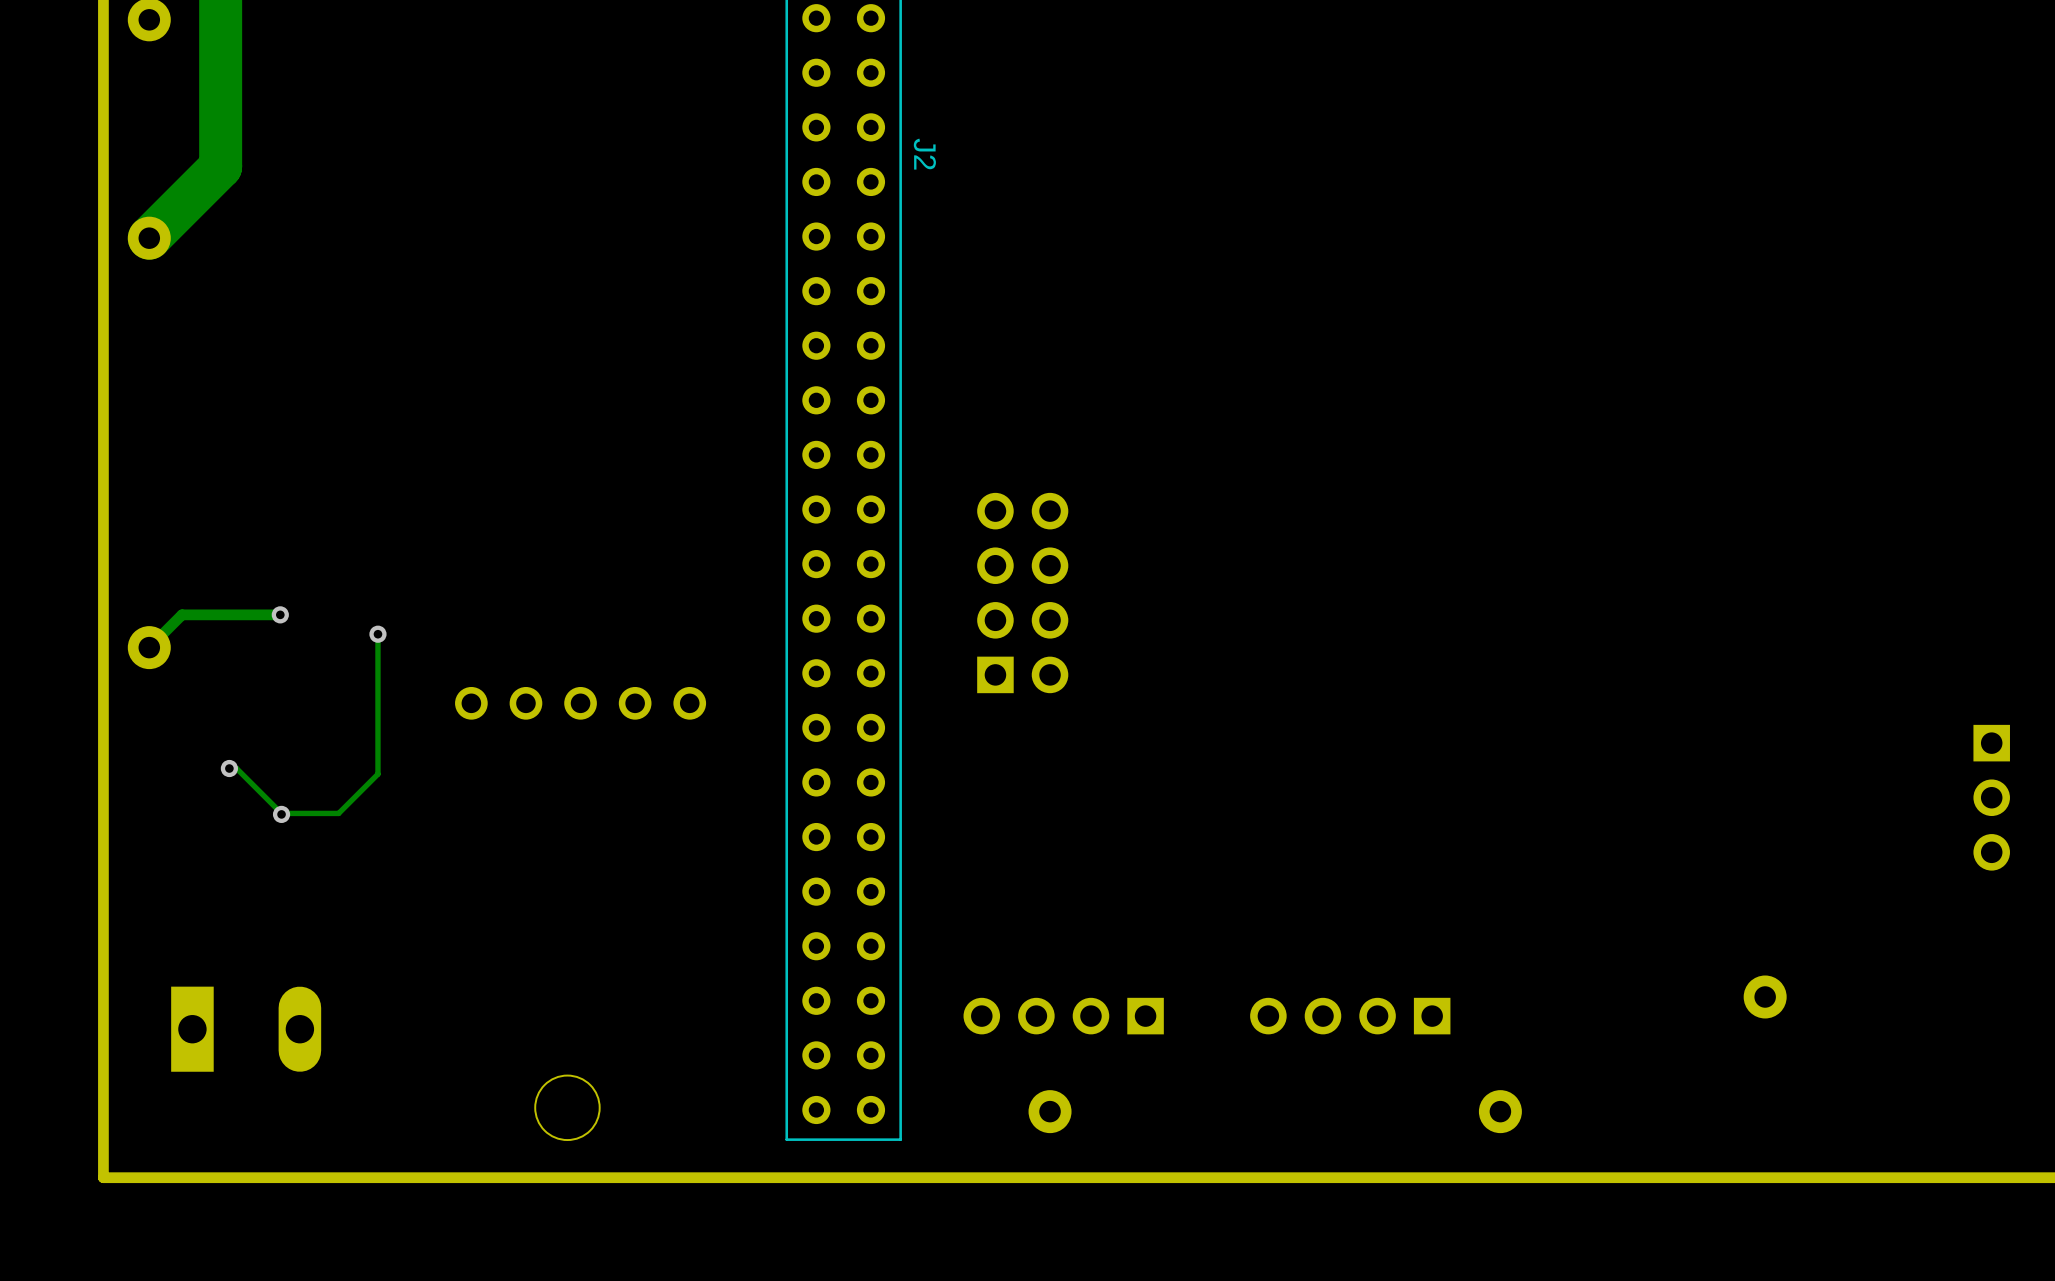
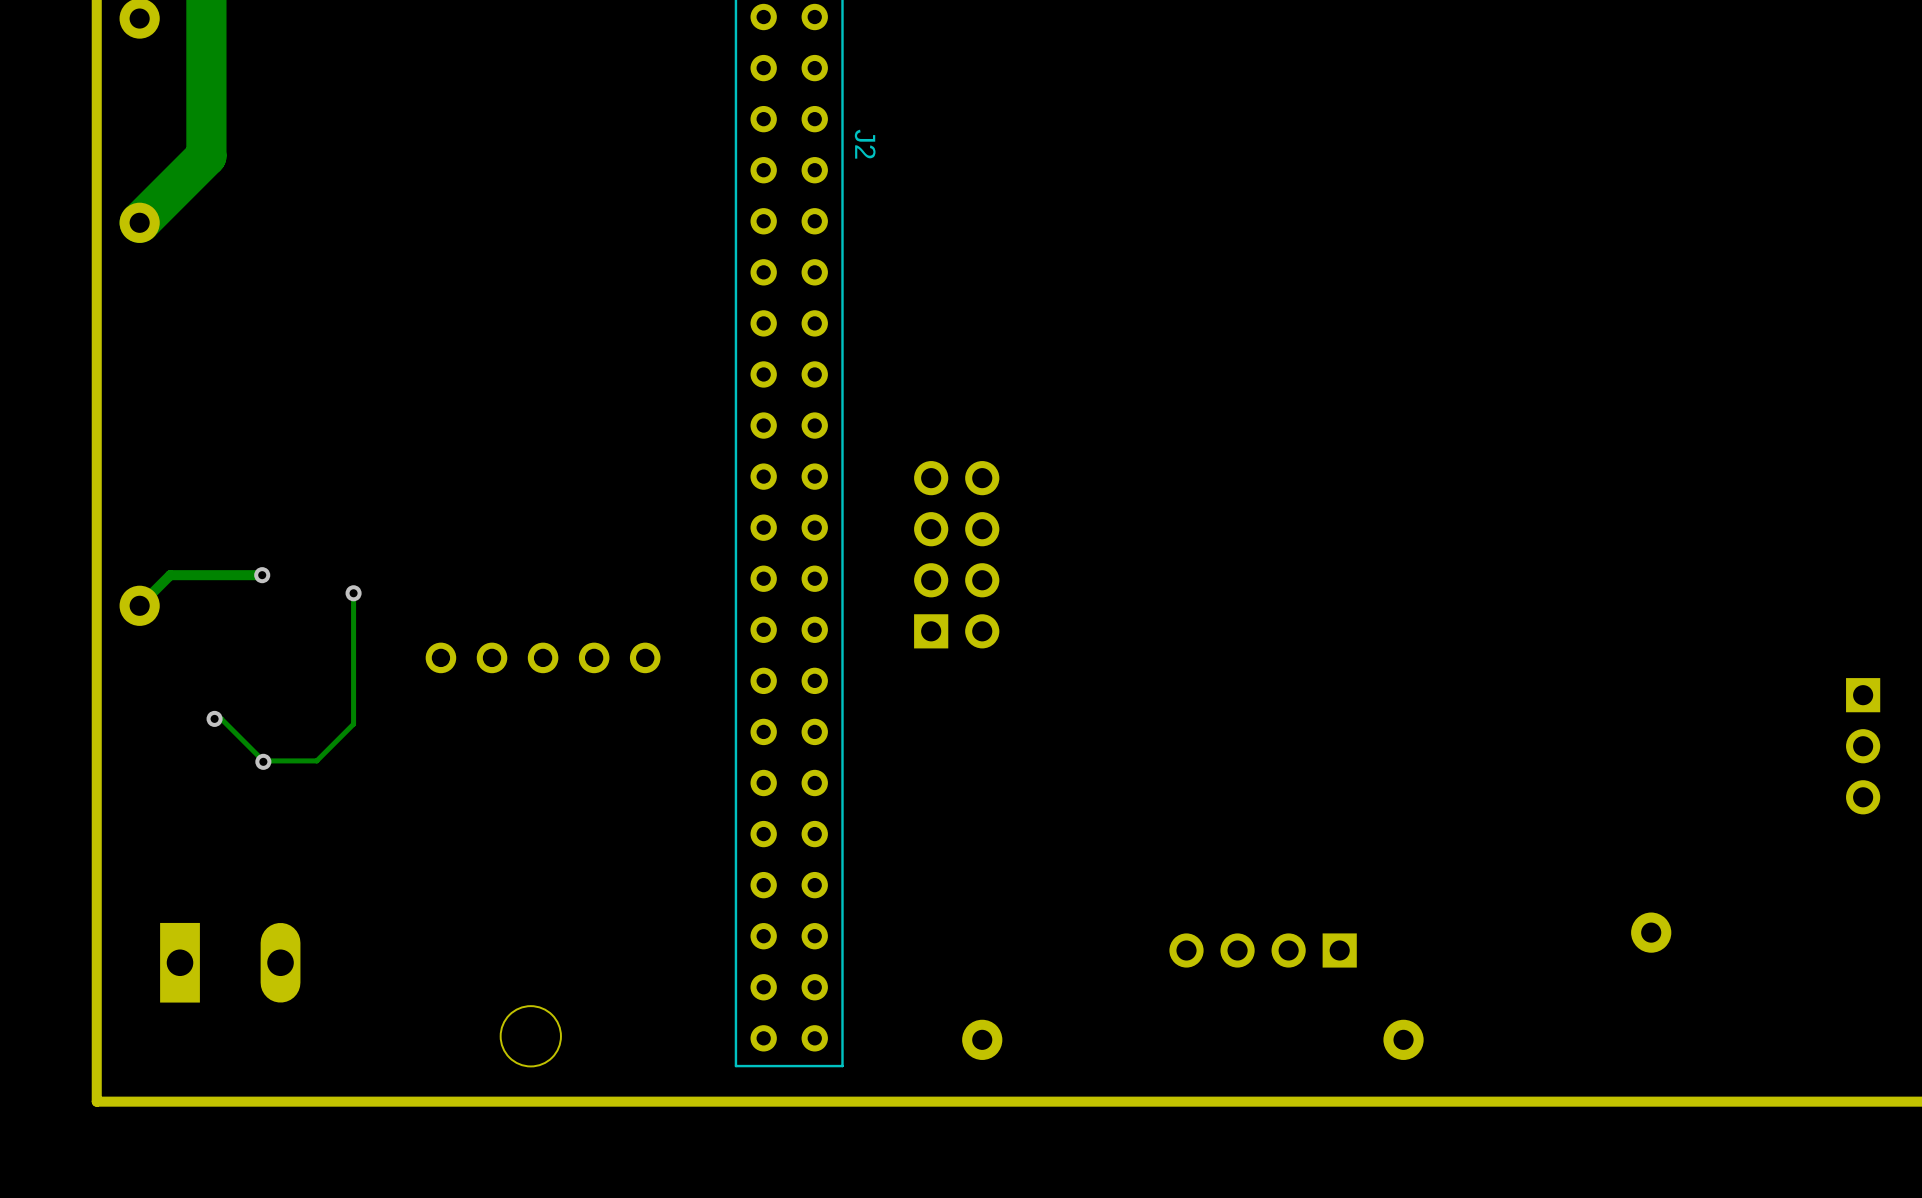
part: (1063, 1016) -> none

